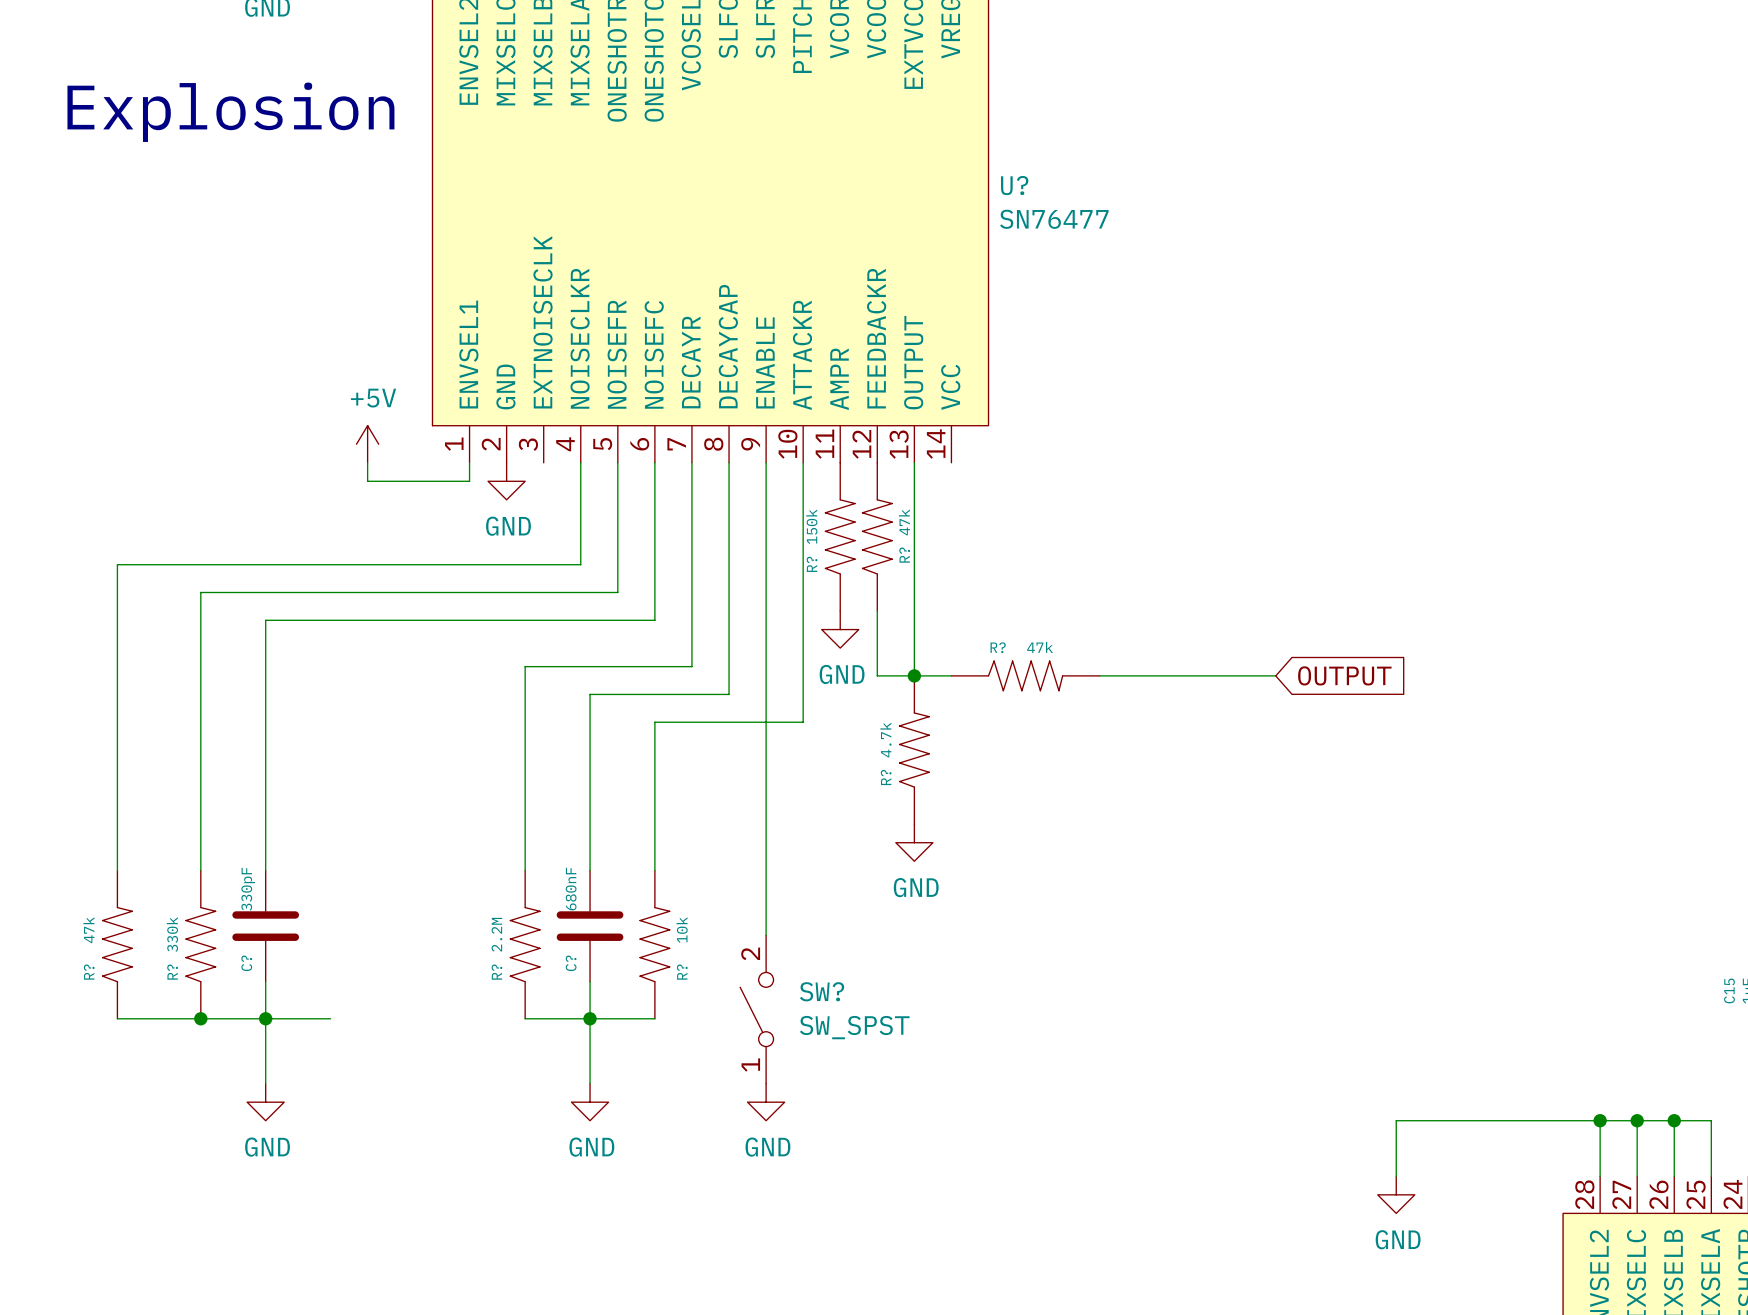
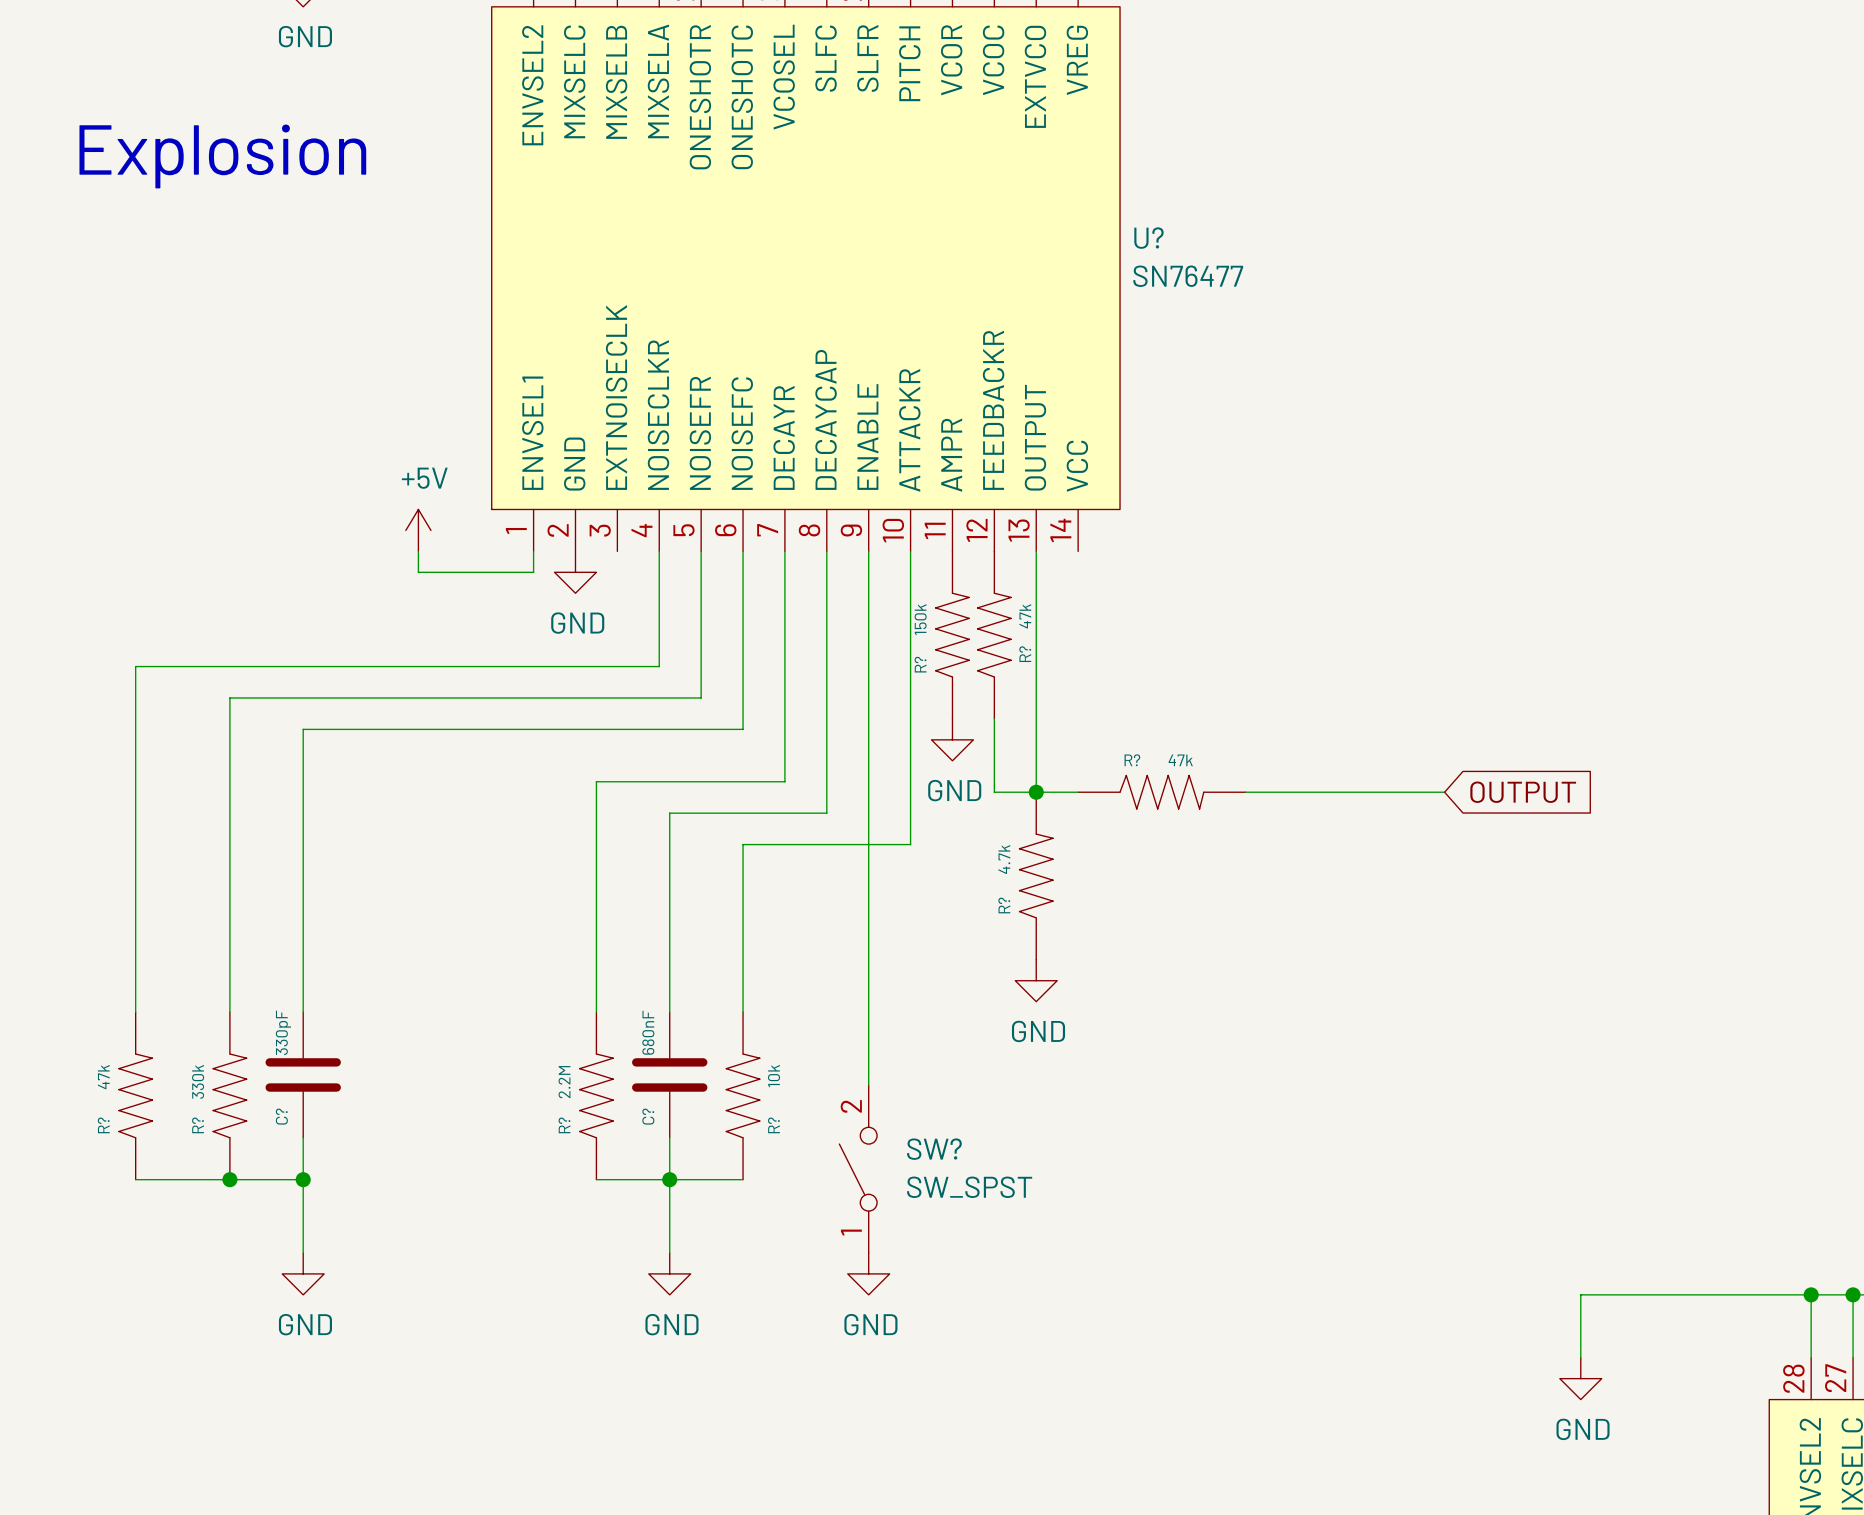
wire: (265, 1018) (330, 1018) -> none

